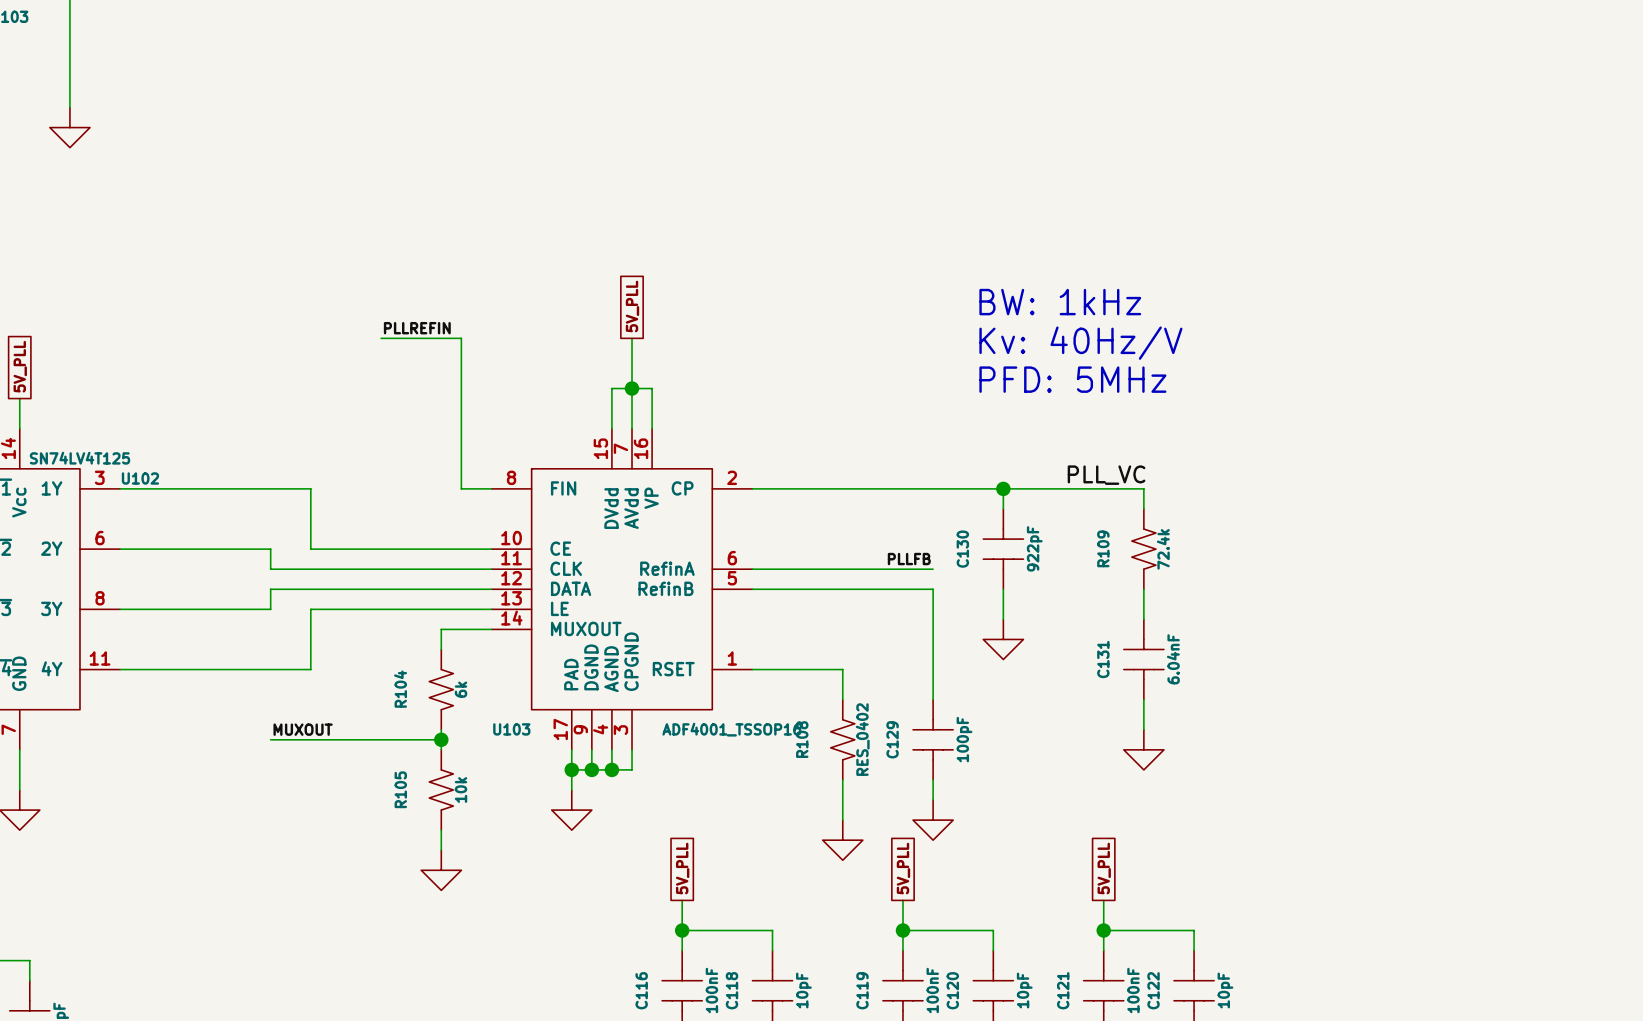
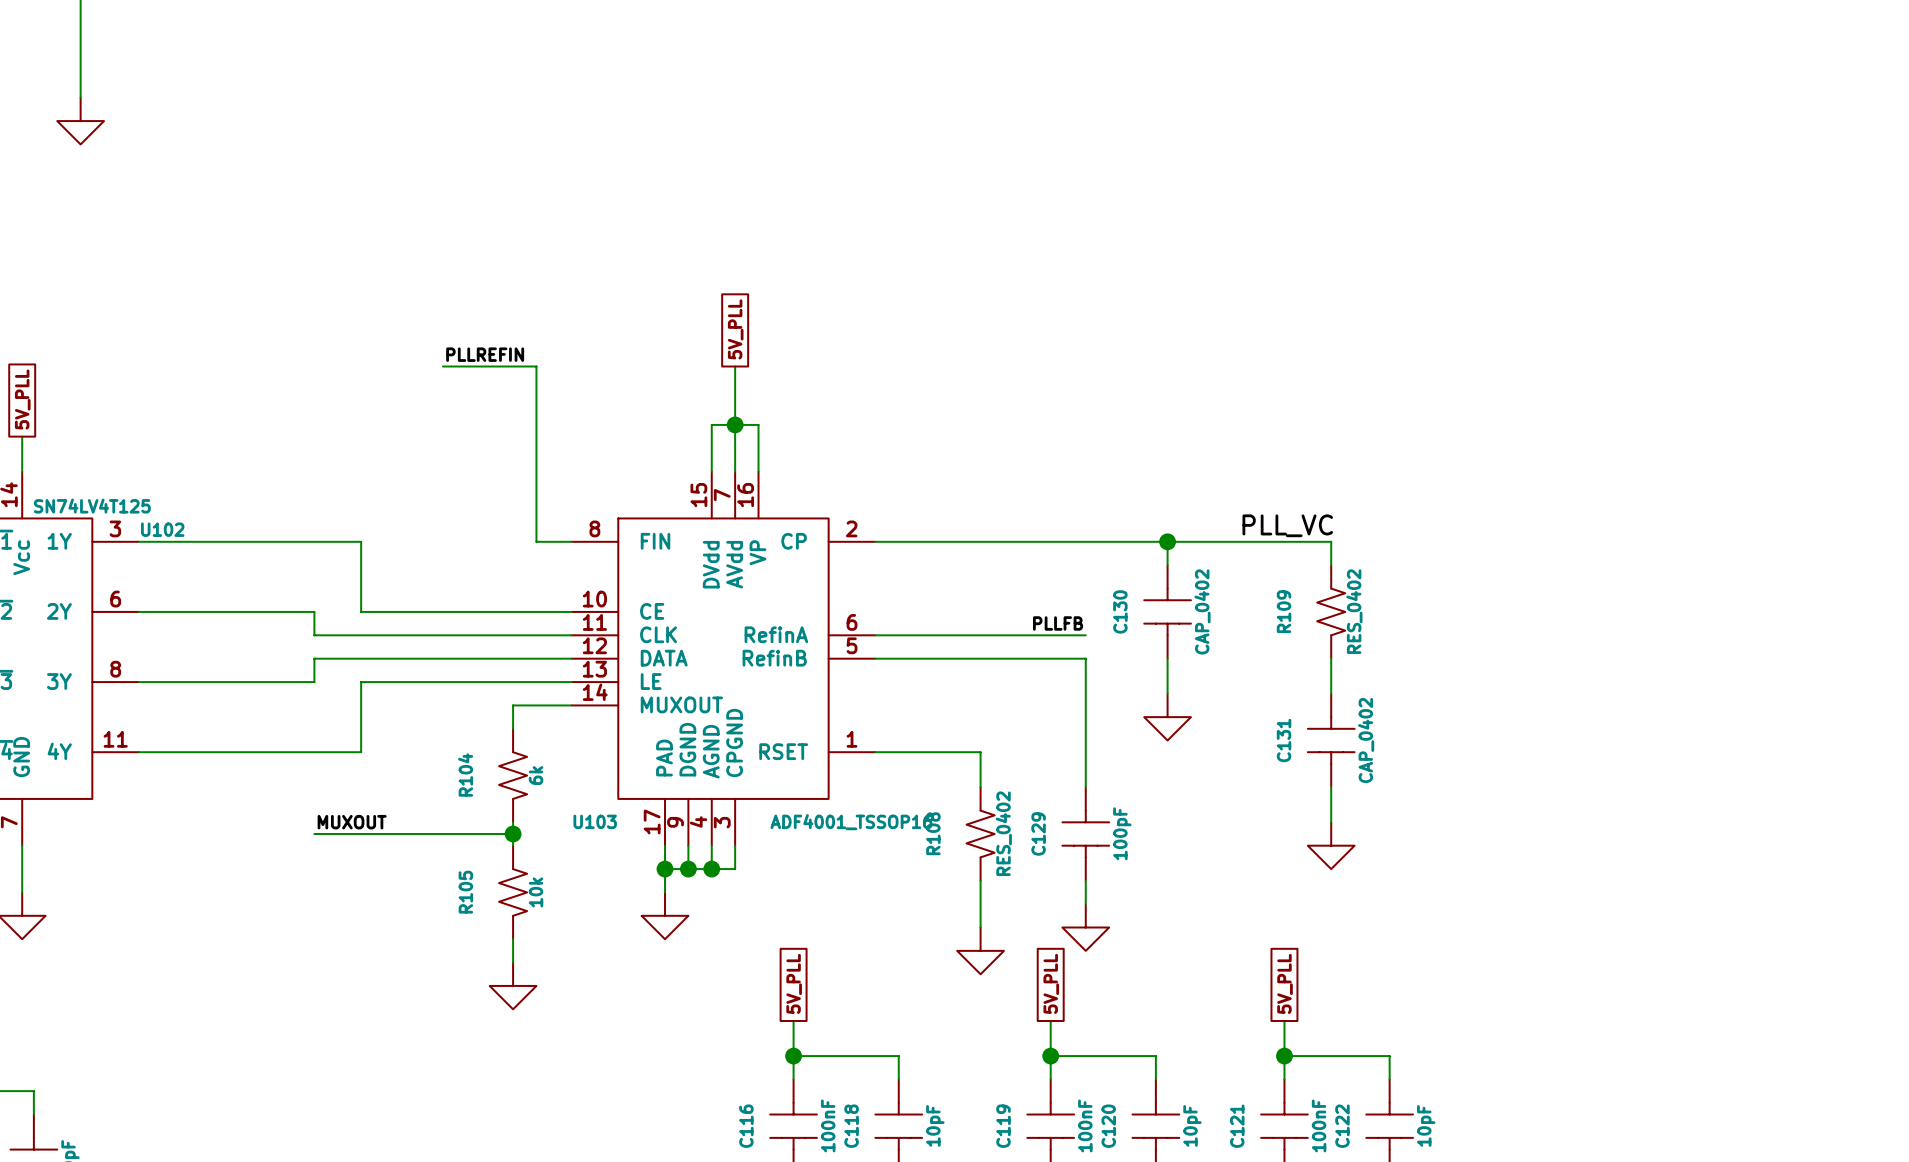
text: BW: 1kHz (1060, 302) -> none
text: Kv: 40Hz/V (1080, 343) -> none
text: PFD: 5MHz (1072, 379) -> none
C130 value: 922pF (1034, 548) -> CAP_0402 (1202, 611)
R109 value: 72.4k (1163, 549) -> RES_0402 (1354, 611)
C131 value: 6.04nF (1173, 659) -> CAP_0402 (1366, 740)

